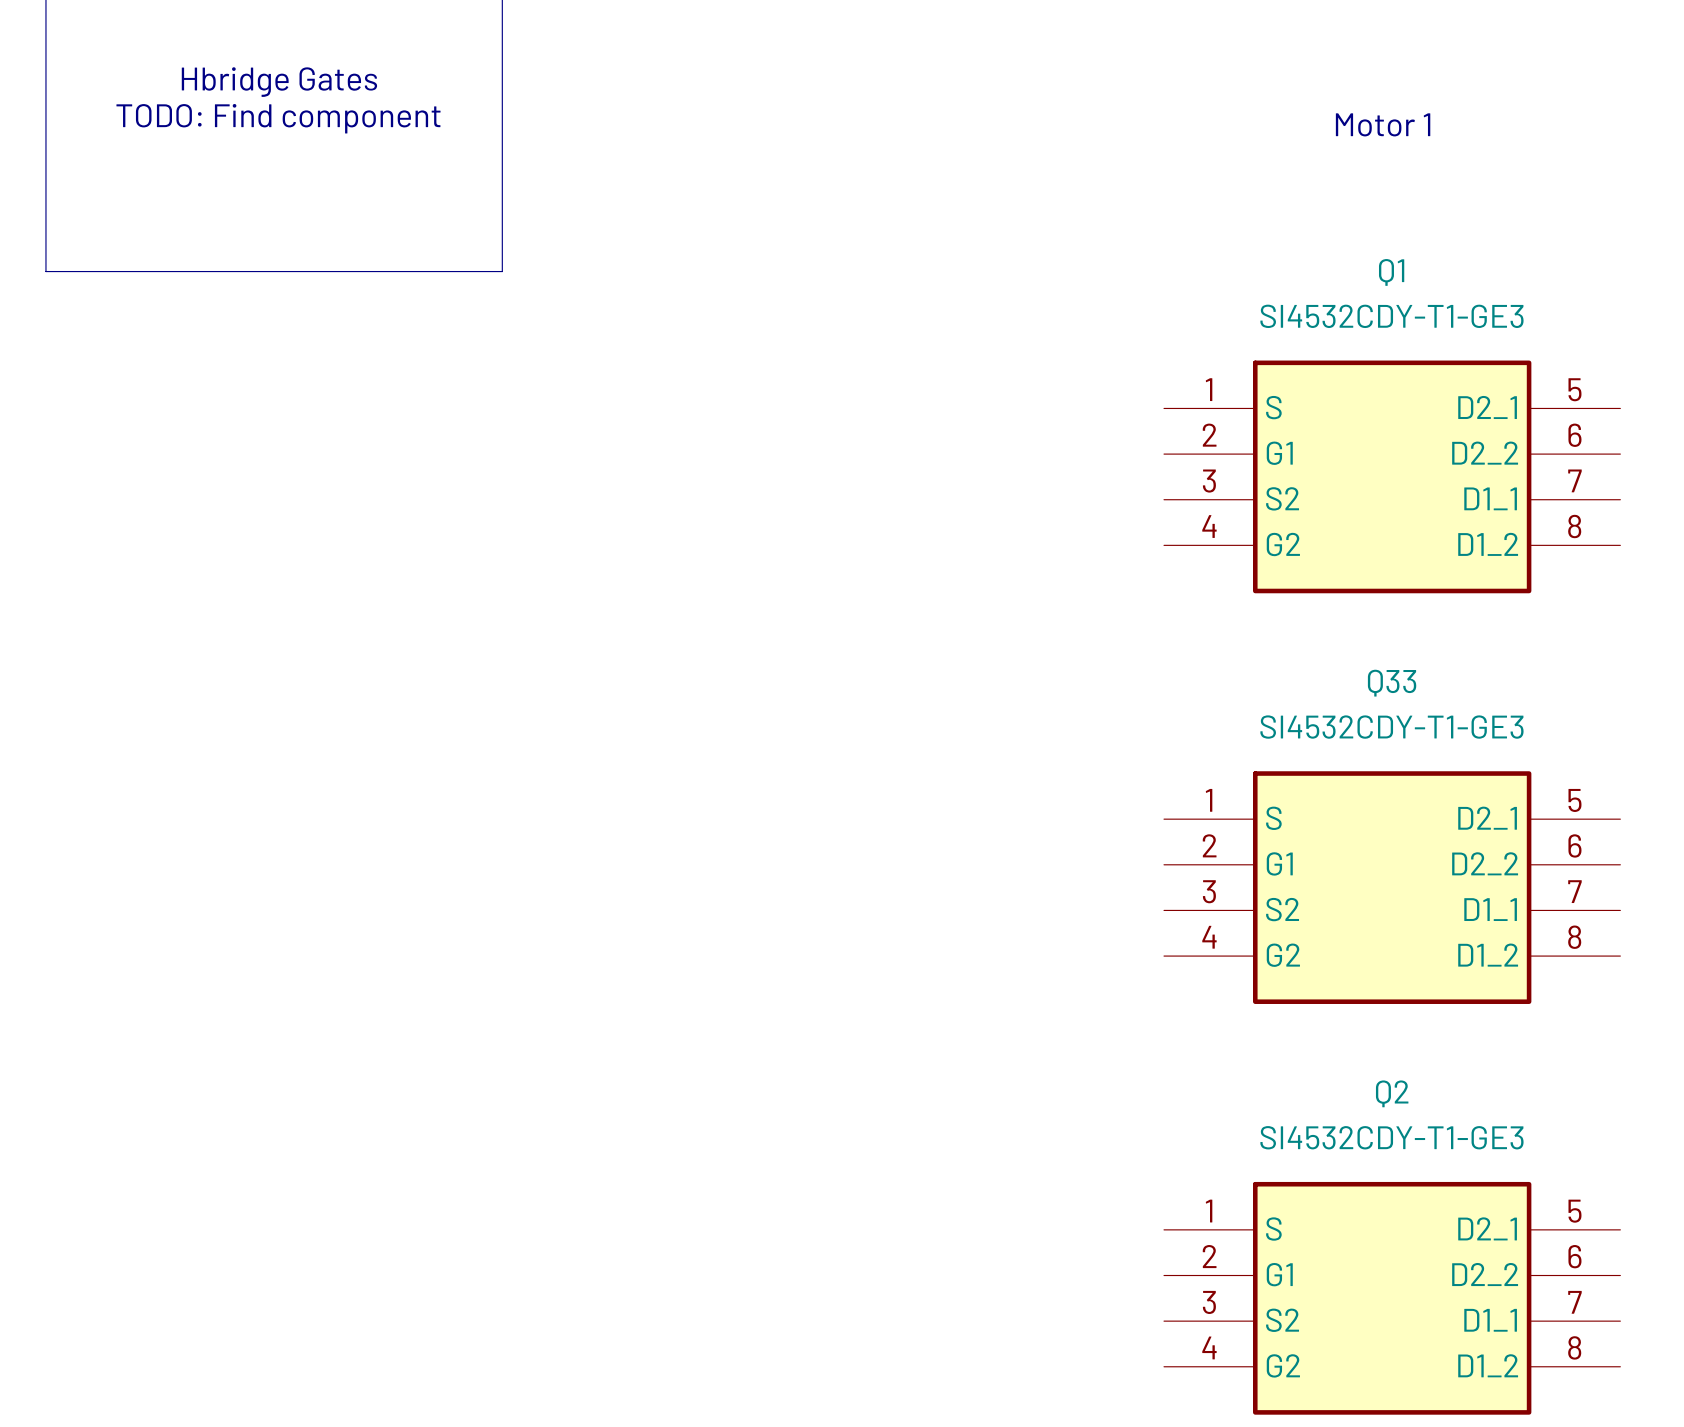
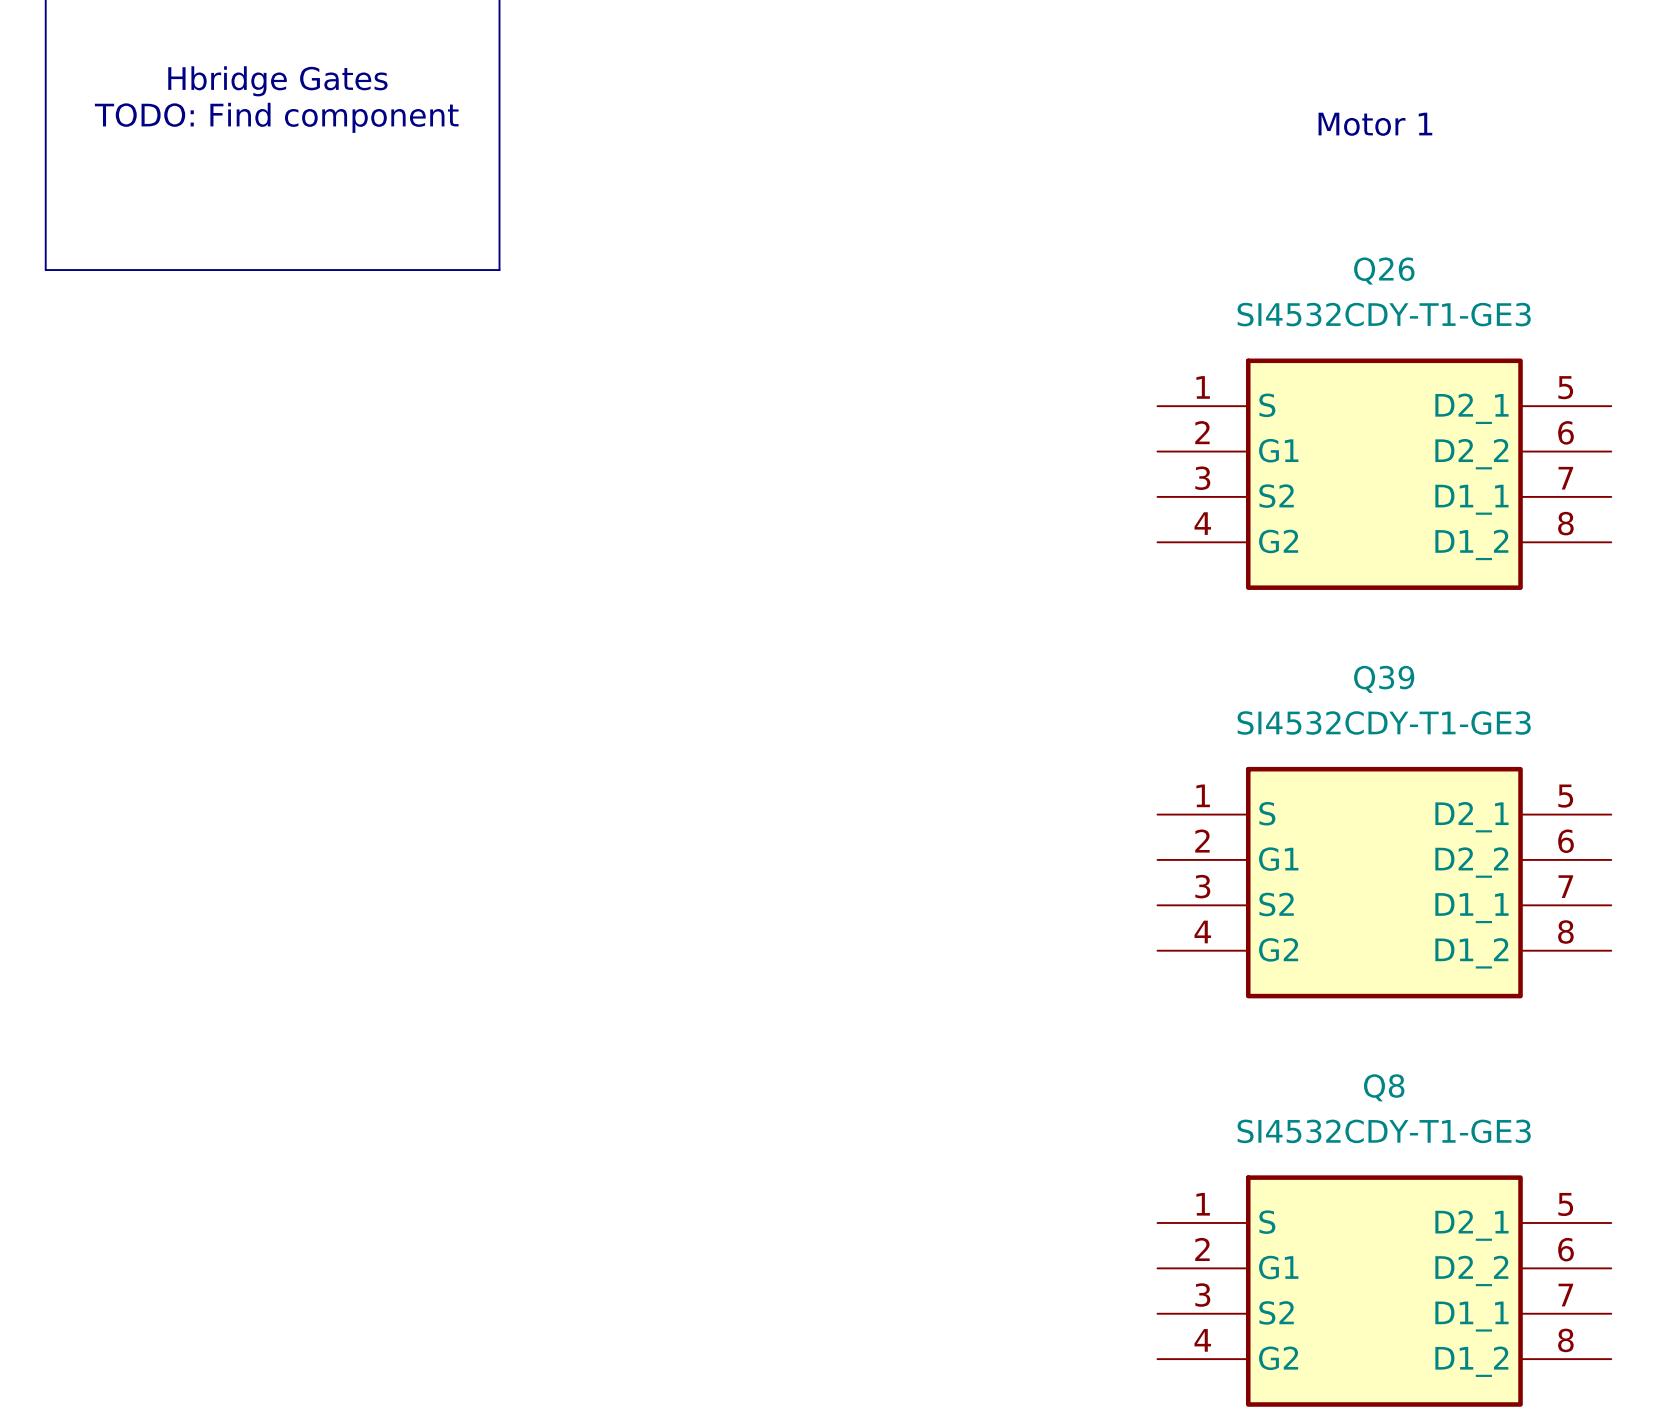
Q1 name: Q1 (1391, 272) -> Q26 (1384, 270)
Q33 name: Q33 (1392, 683) -> Q39 (1384, 679)
Q2 name: Q2 (1392, 1093) -> Q8 (1384, 1087)

